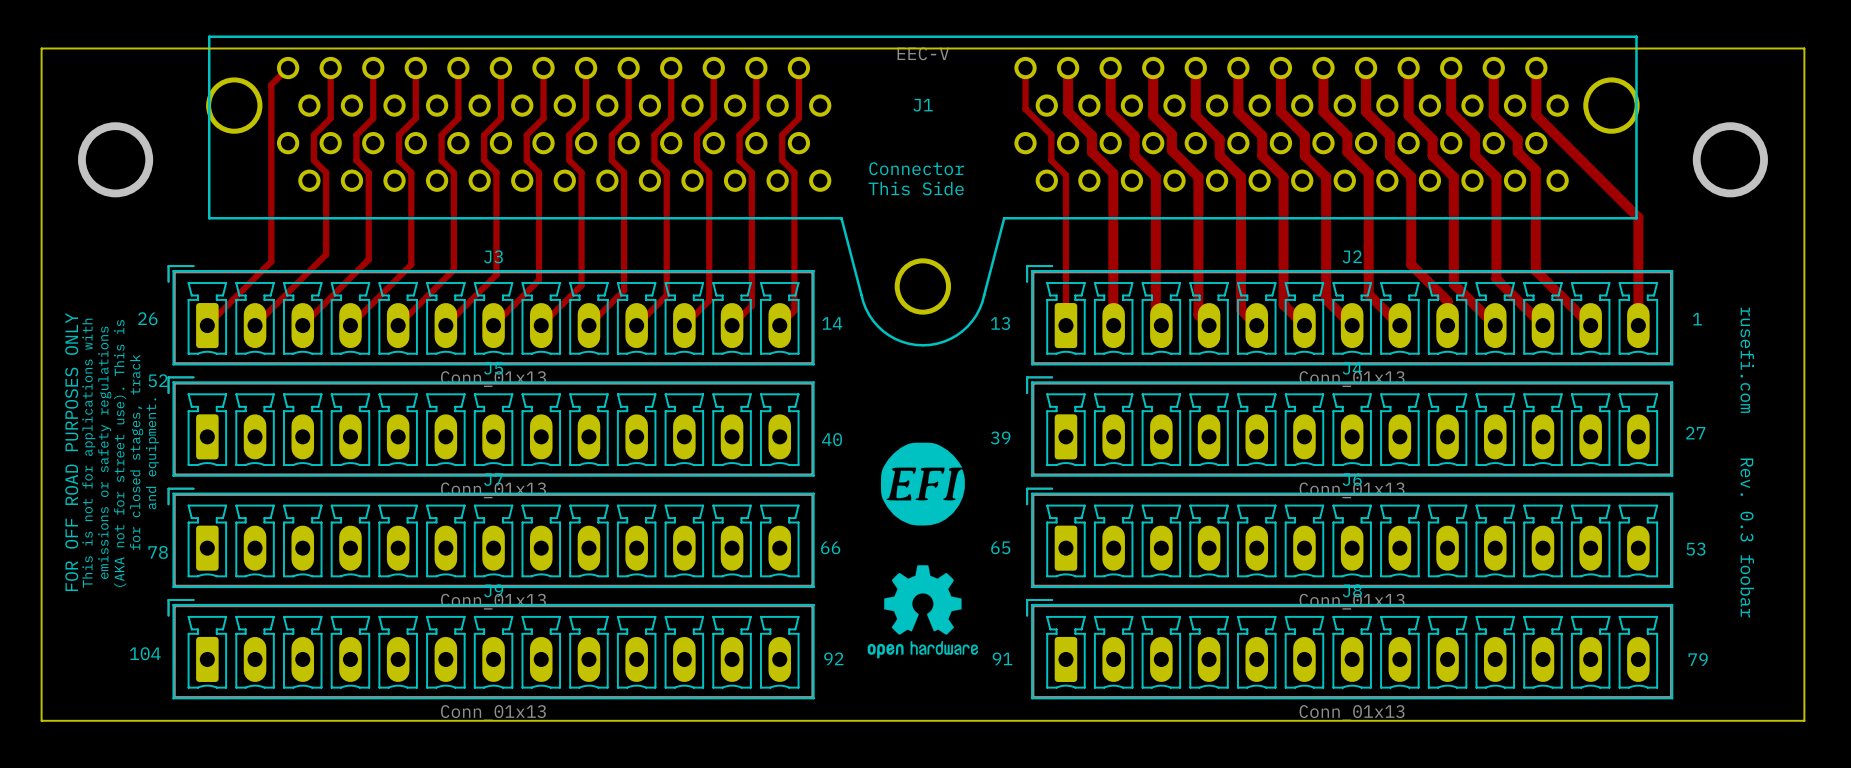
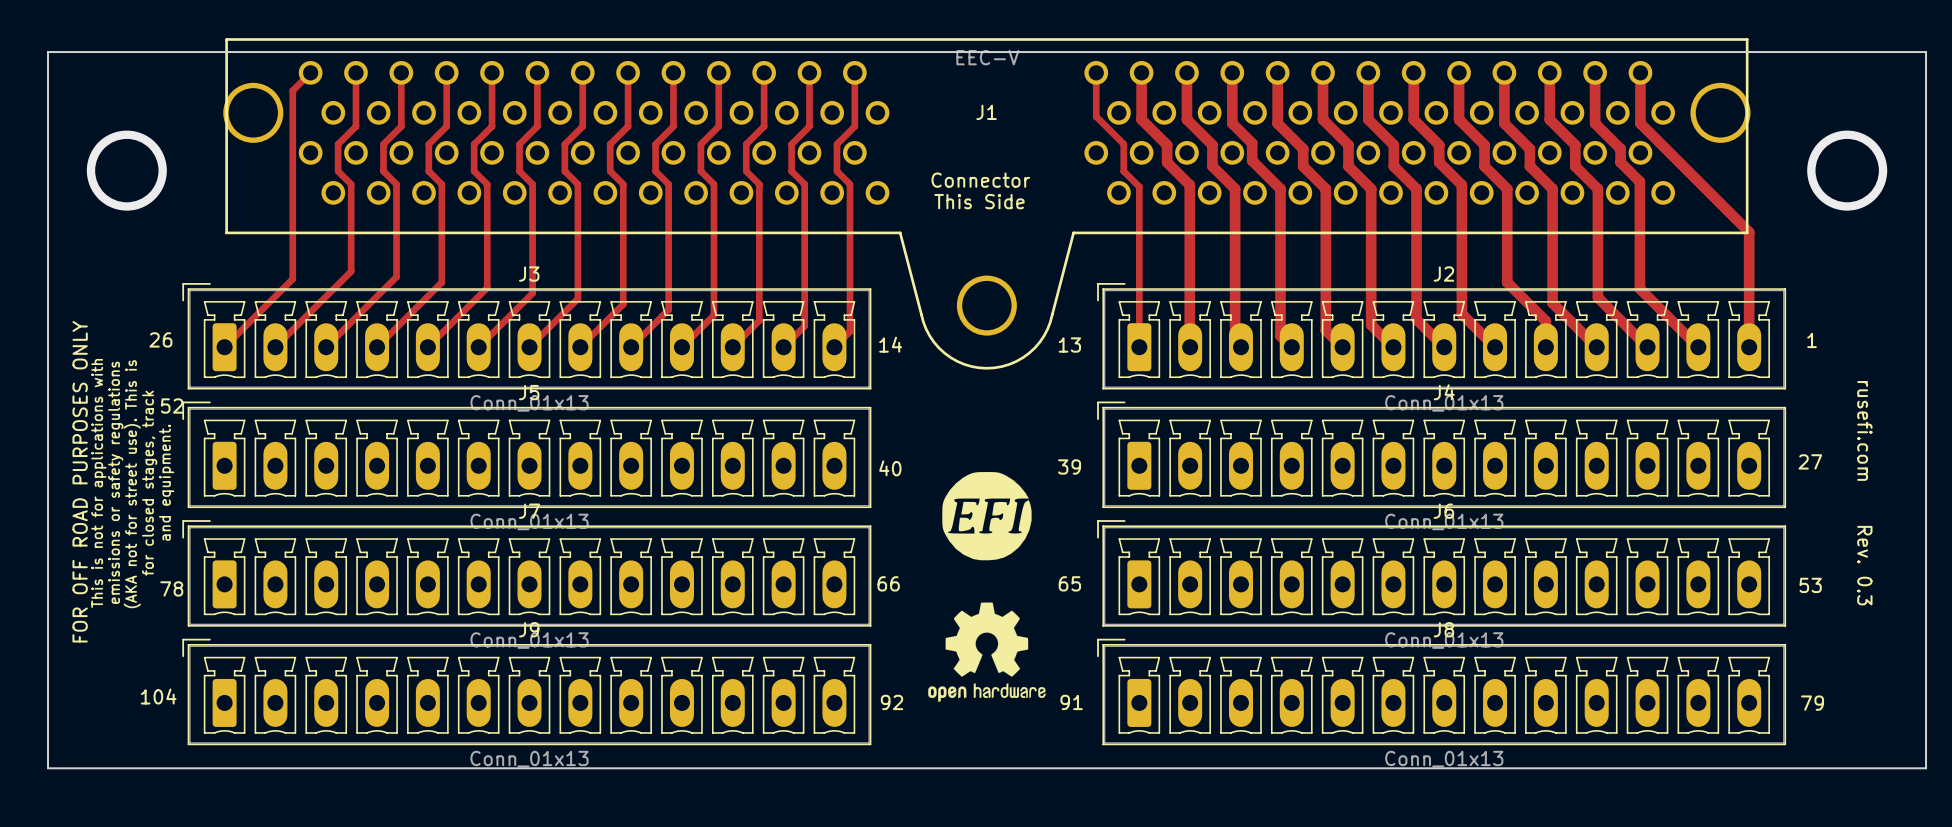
text: rusefi.com Rev. 0.3 foobar (1747, 462) -> rusefi.com Rev. 0.3 (1864, 493)

